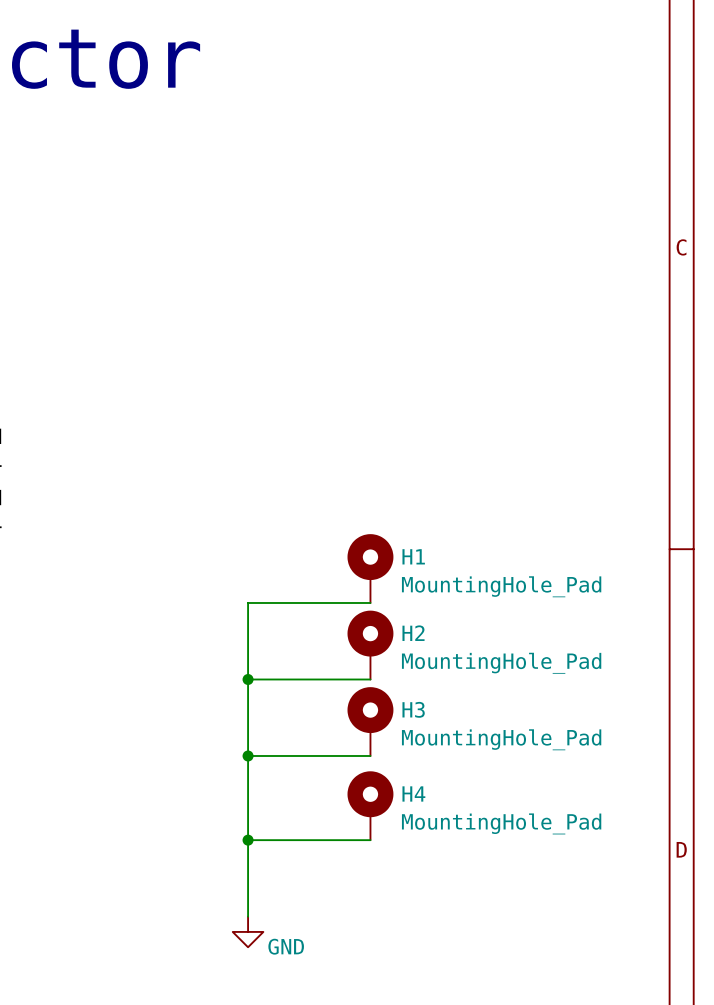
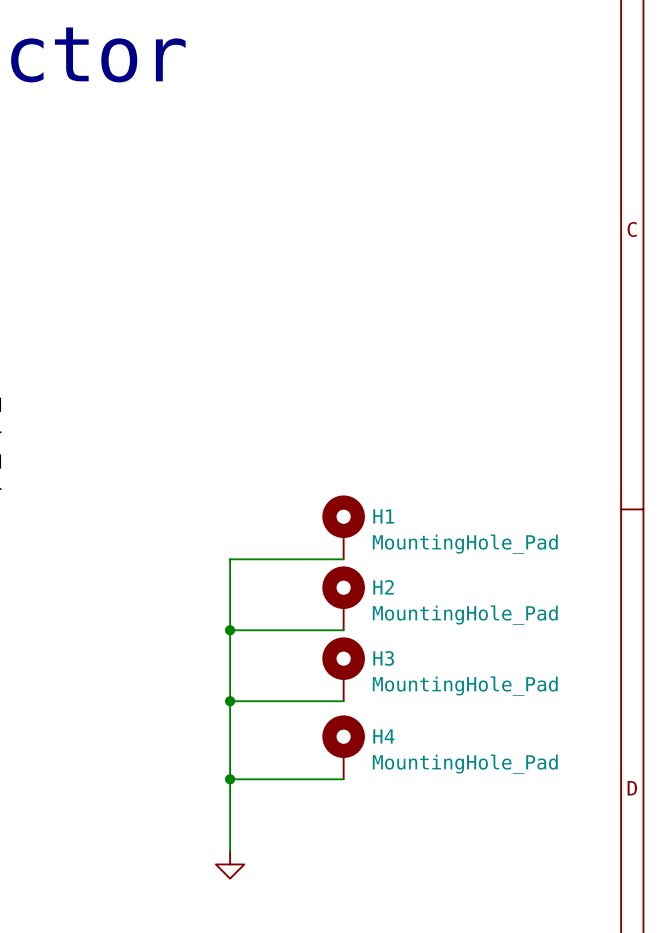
power symbol text: GND (286, 946) -> none

